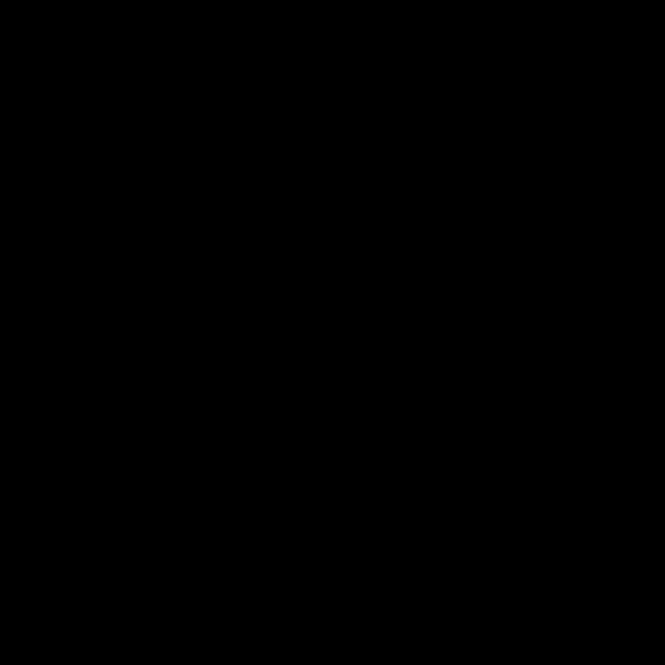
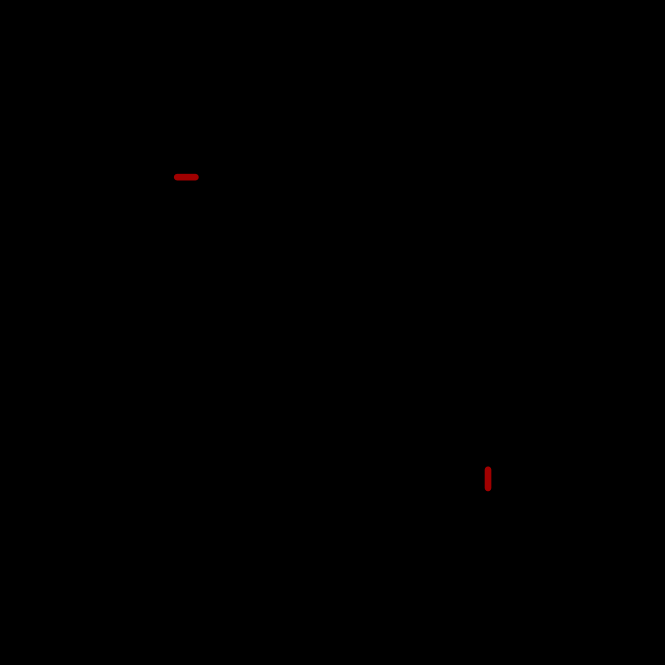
top track: none -> (177, 177) (195, 177)
top track: none -> (488, 469) (488, 488)

